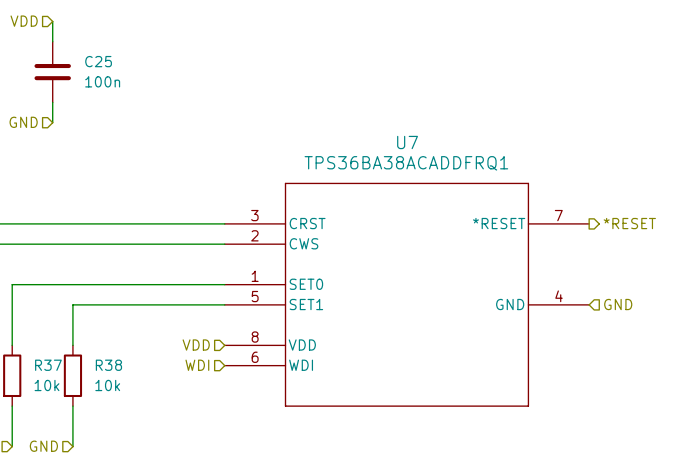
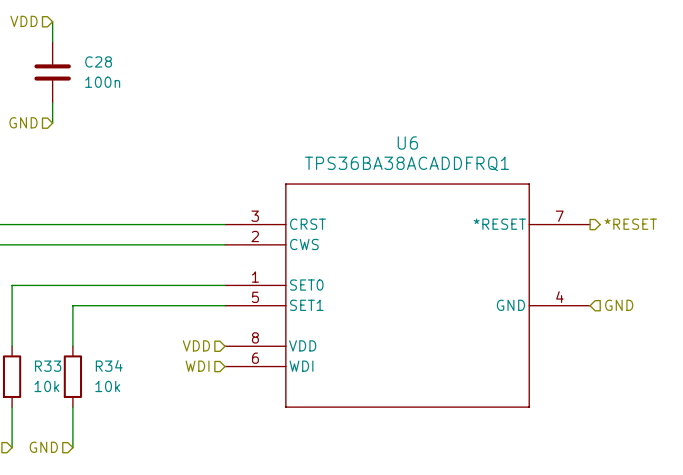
C25 name: C25 (98, 61) -> C28 (98, 61)
U7 name: U7 (407, 142) -> U6 (407, 143)
R37 name: R37 (48, 365) -> R33 (48, 366)
R38 name: R38 (108, 365) -> R34 (109, 365)

